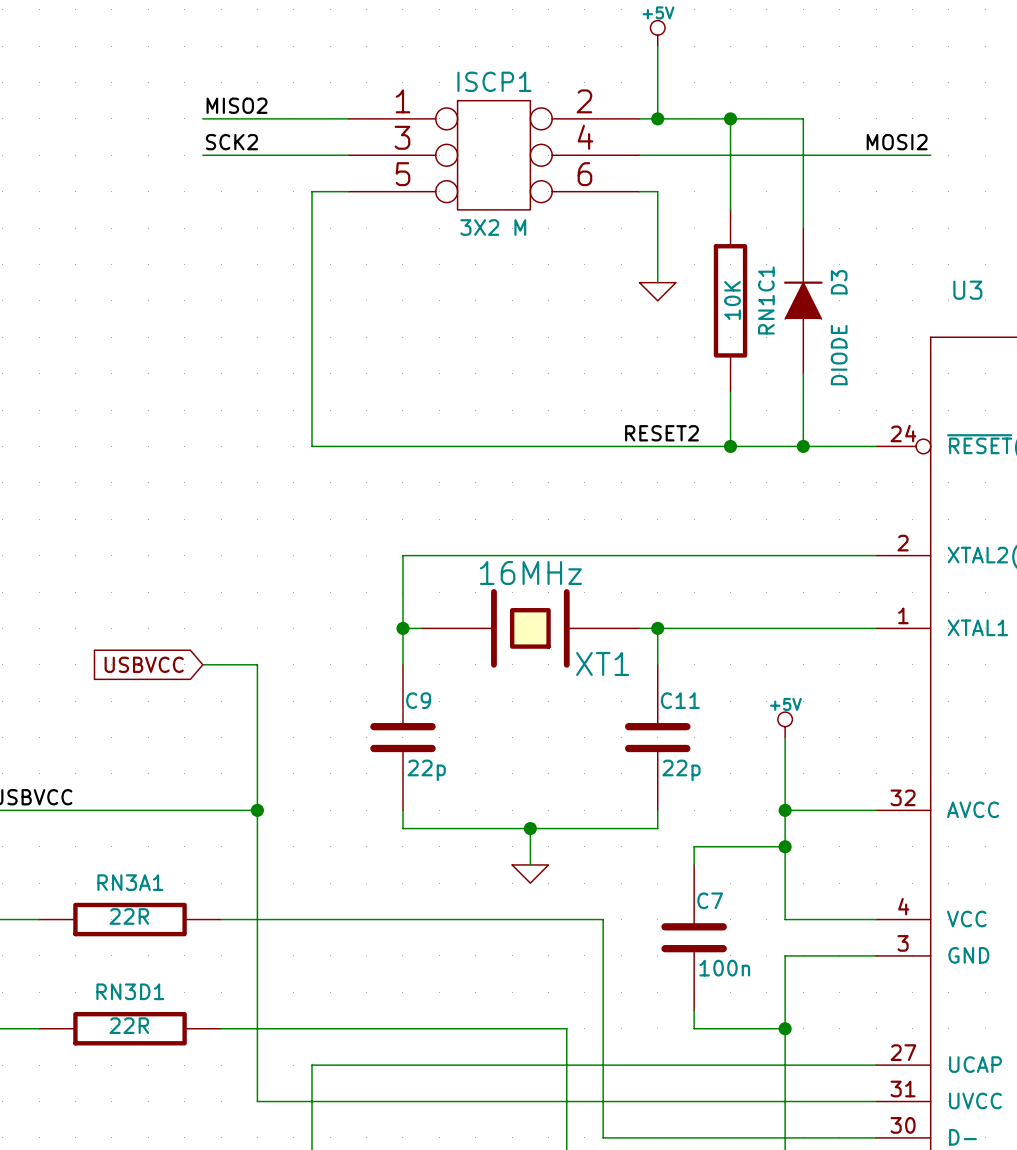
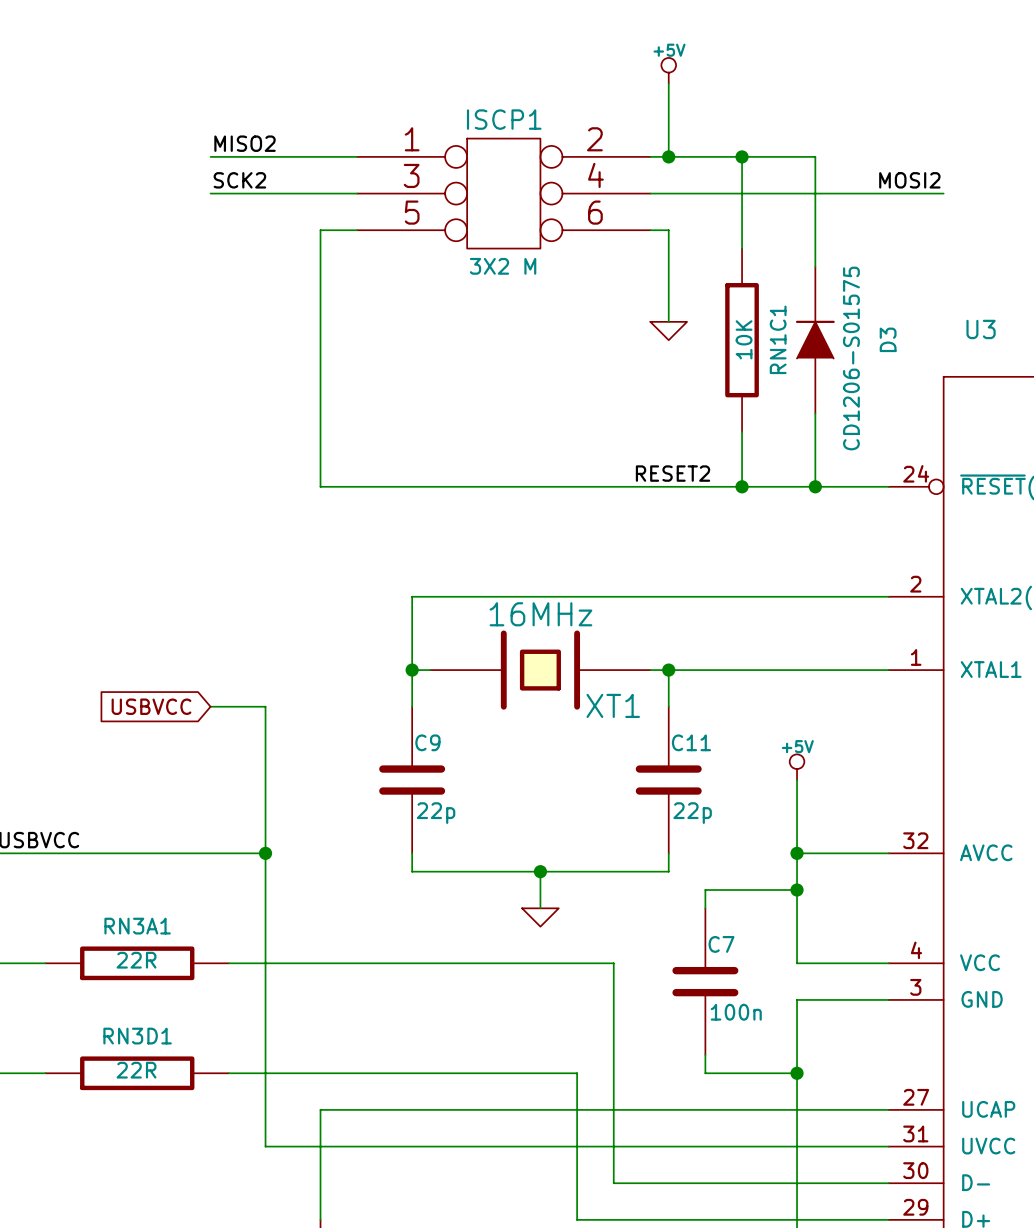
D3 name position: D3 (839, 282) -> D3 (888, 339)
D3 value: DIODE (839, 355) -> CD1206-S01575 (851, 358)

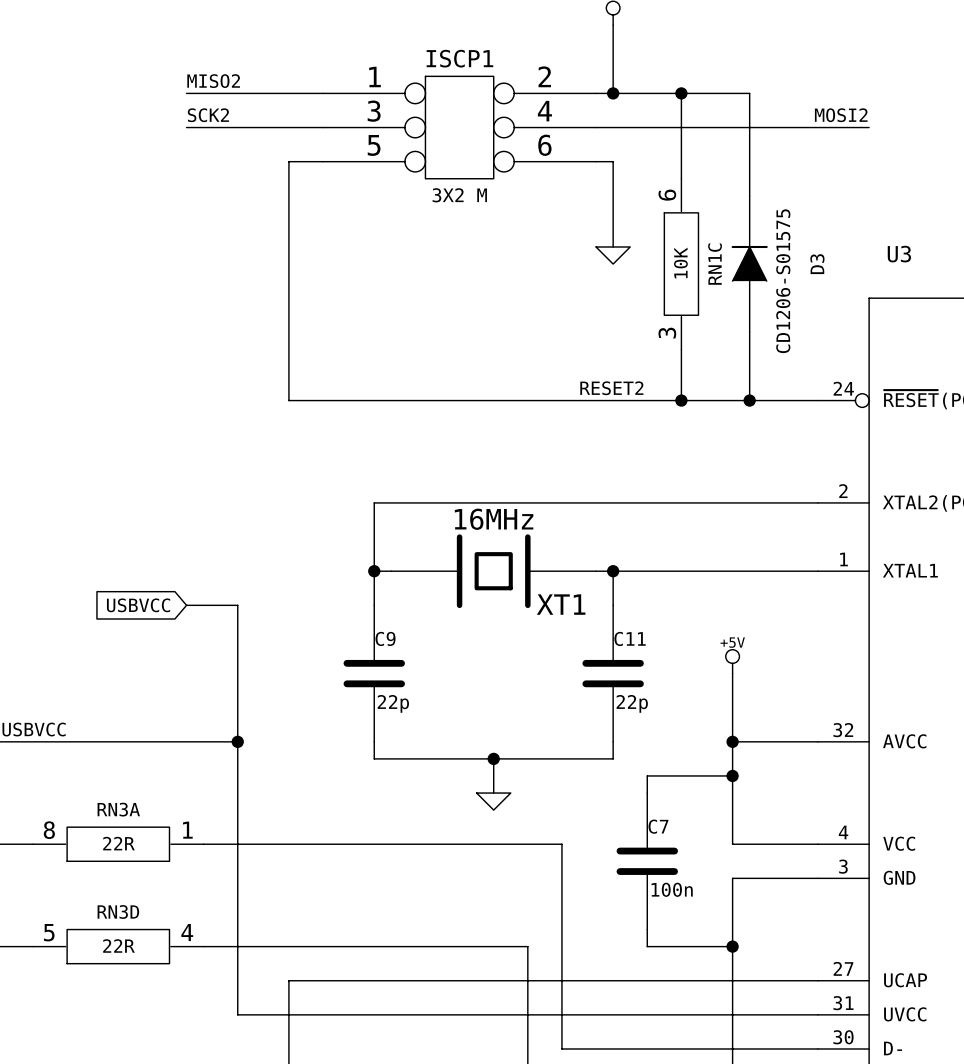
RN1C1: 10K (742, 340) -> none
RN1C: none -> 10K (681, 264)
RN3A1: 22R (137, 963) -> none
RN3A: none -> 22R (118, 844)
RN3D1: 22R (137, 1073) -> none
RN3D: none -> 22R (118, 946)

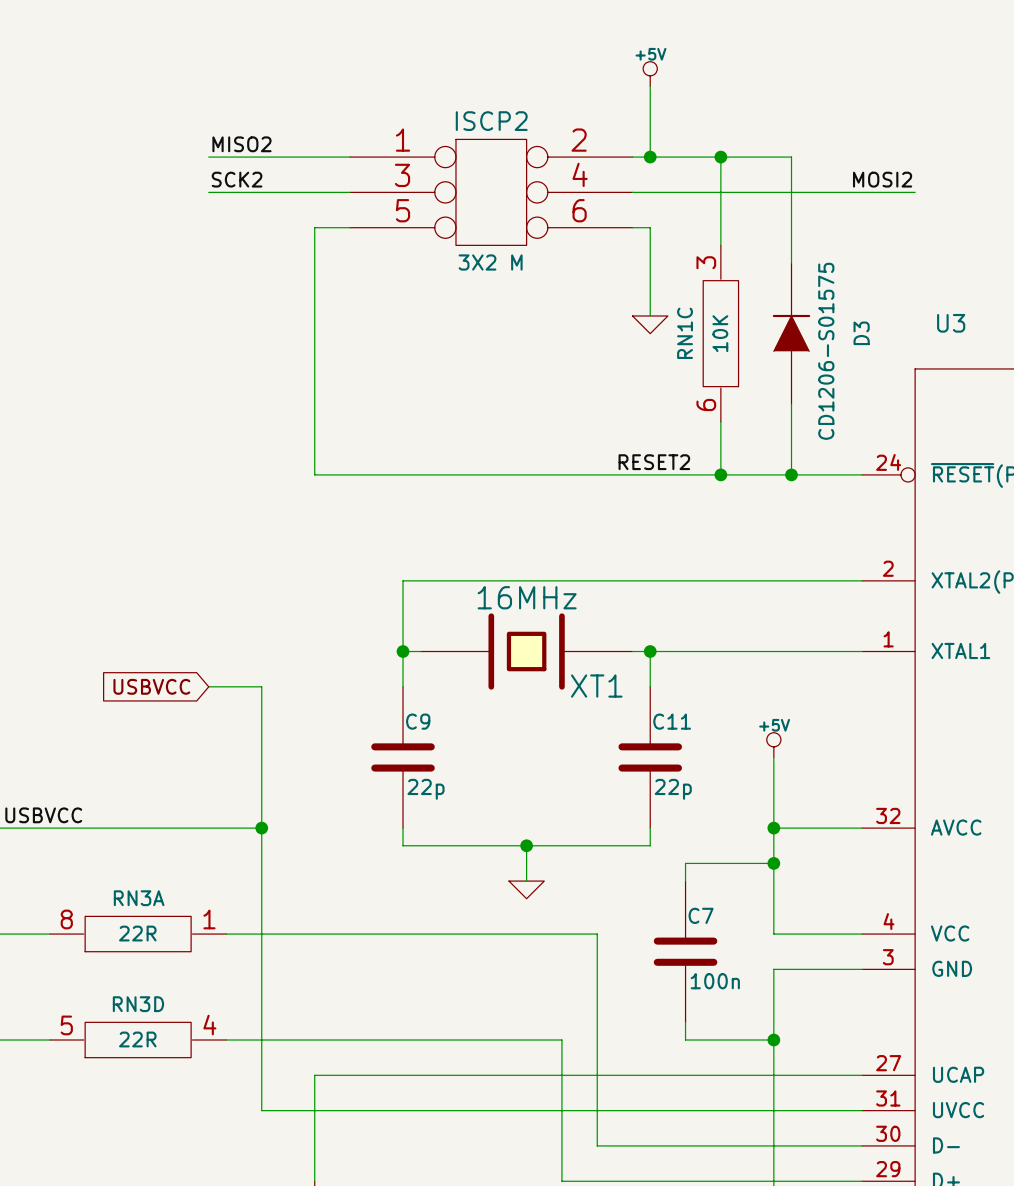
ISCP1 name: ISCP1 (459, 58) -> ISCP2 (491, 121)
RN1C rotation: 0° (681, 264) -> 180° (720, 333)

